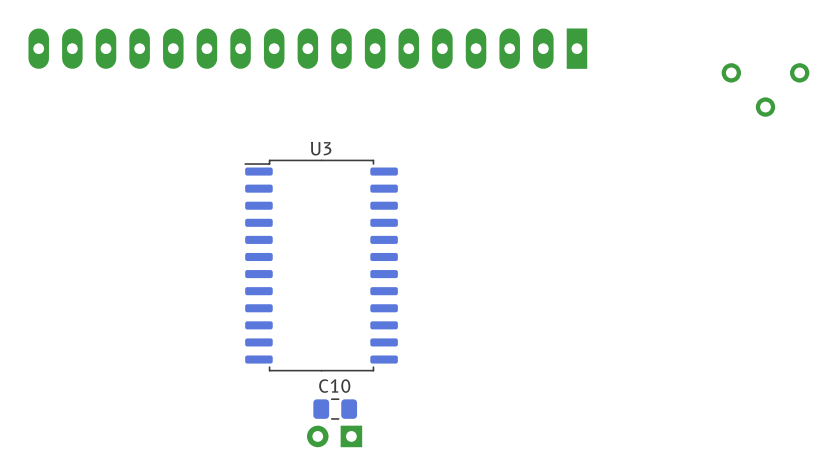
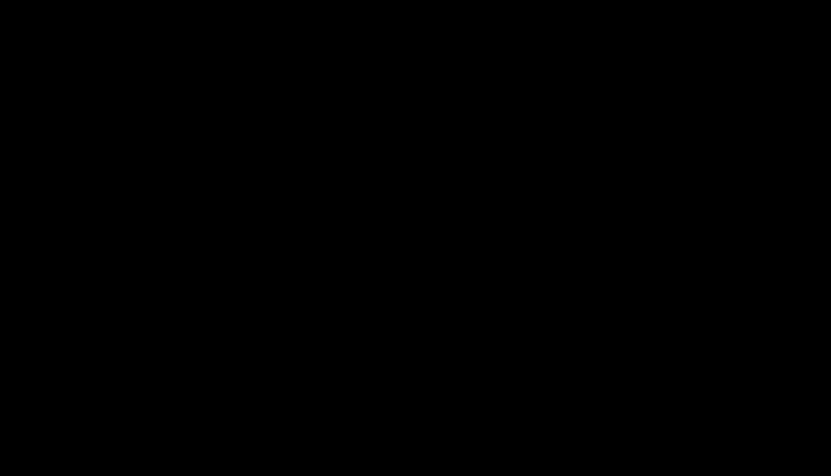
part: (307, 48) -> none
part: (765, 89) -> none
U3: (321, 265) -> none
C10: (335, 409) -> none
part: (334, 436) -> none

